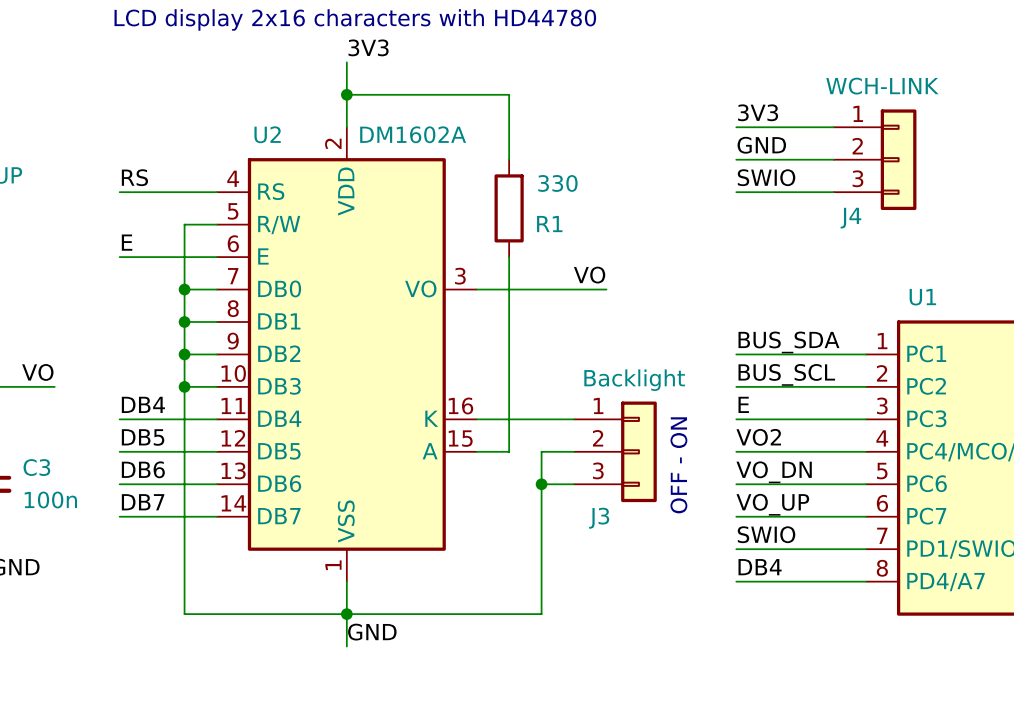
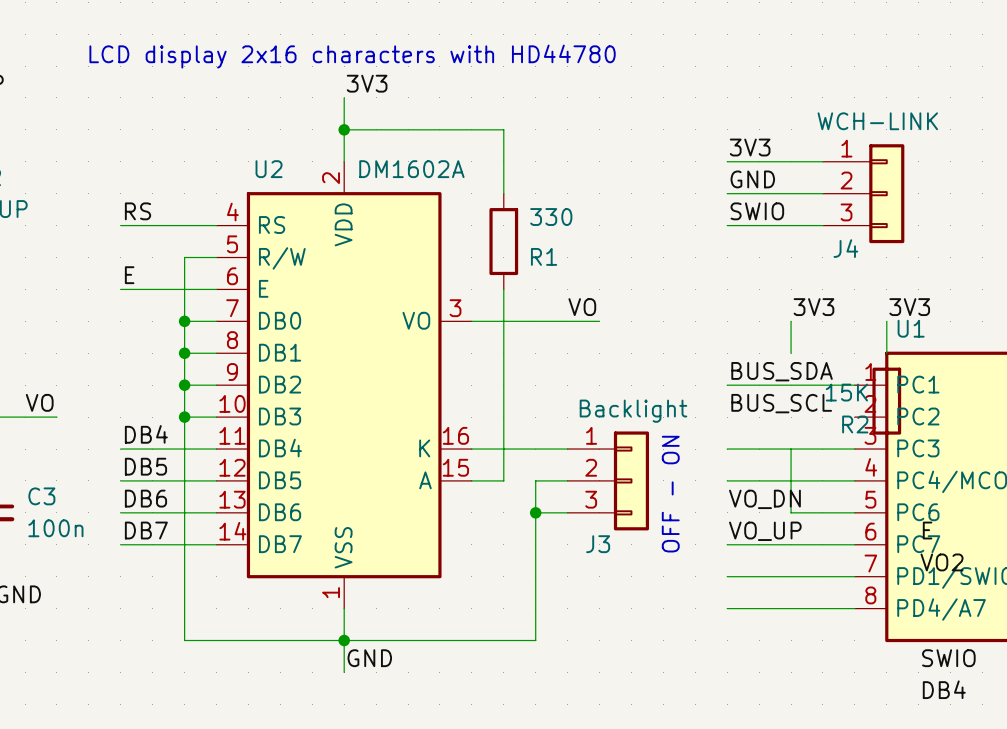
label: none -> 3V3 (813, 307)
label: none -> 3V3 (909, 307)
wire: none -> (791, 321) (791, 353)
wire: none -> (886, 321) (886, 353)
R2: none -> 15K (886, 401)
wire: (736, 386) (866, 386) -> none
label position: E (743, 404) -> E (927, 530)
label position: VO2 (758, 437) -> VO2 (942, 562)
wire: (736, 484) (801, 484) -> (791, 449) (791, 512)
label position: SWIO (766, 534) -> SWIO (948, 658)
label position: DB4 (760, 567) -> DB4 (944, 689)

